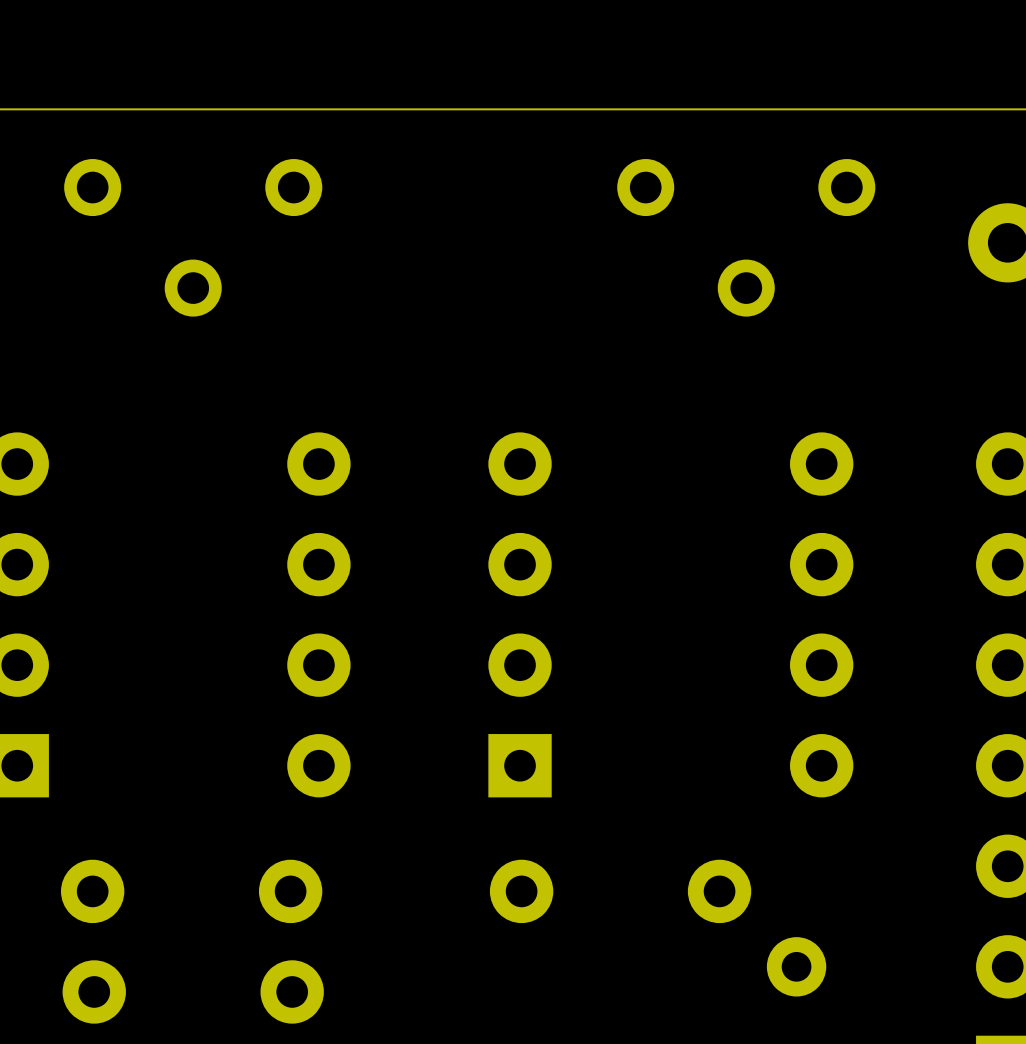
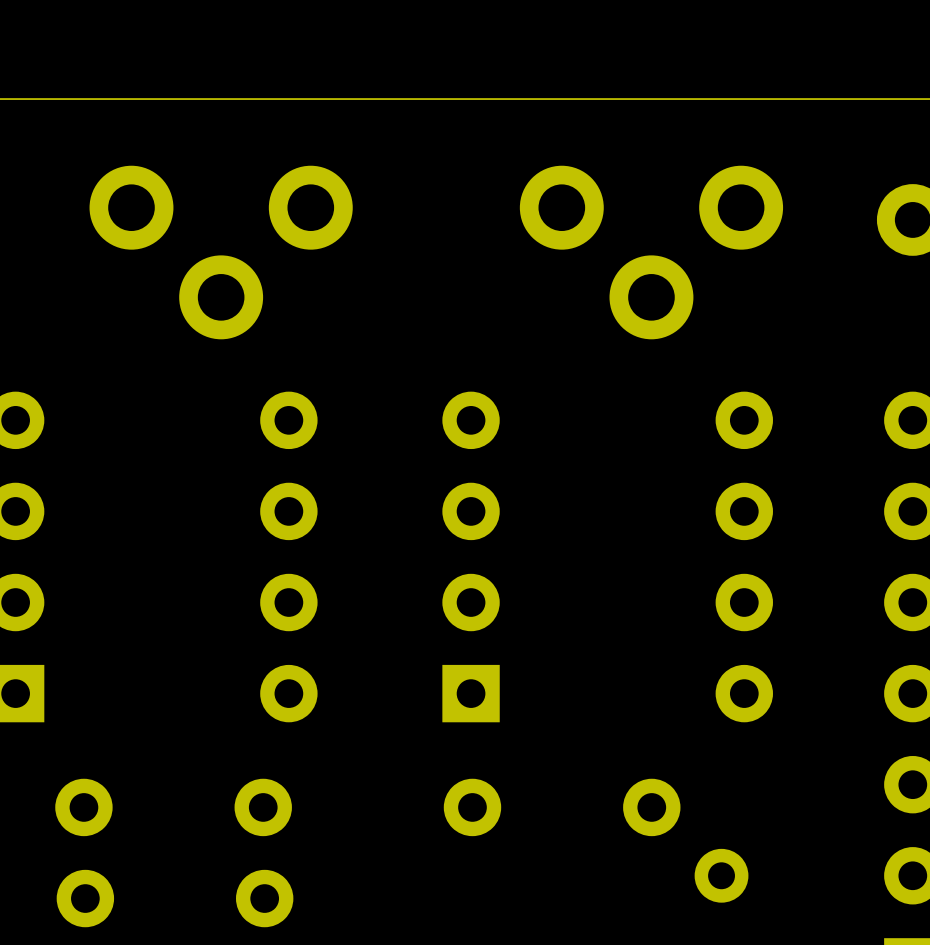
part: (193, 237) -> none
part: (746, 237) -> none
part: none -> (221, 252)
part: none -> (651, 252)

